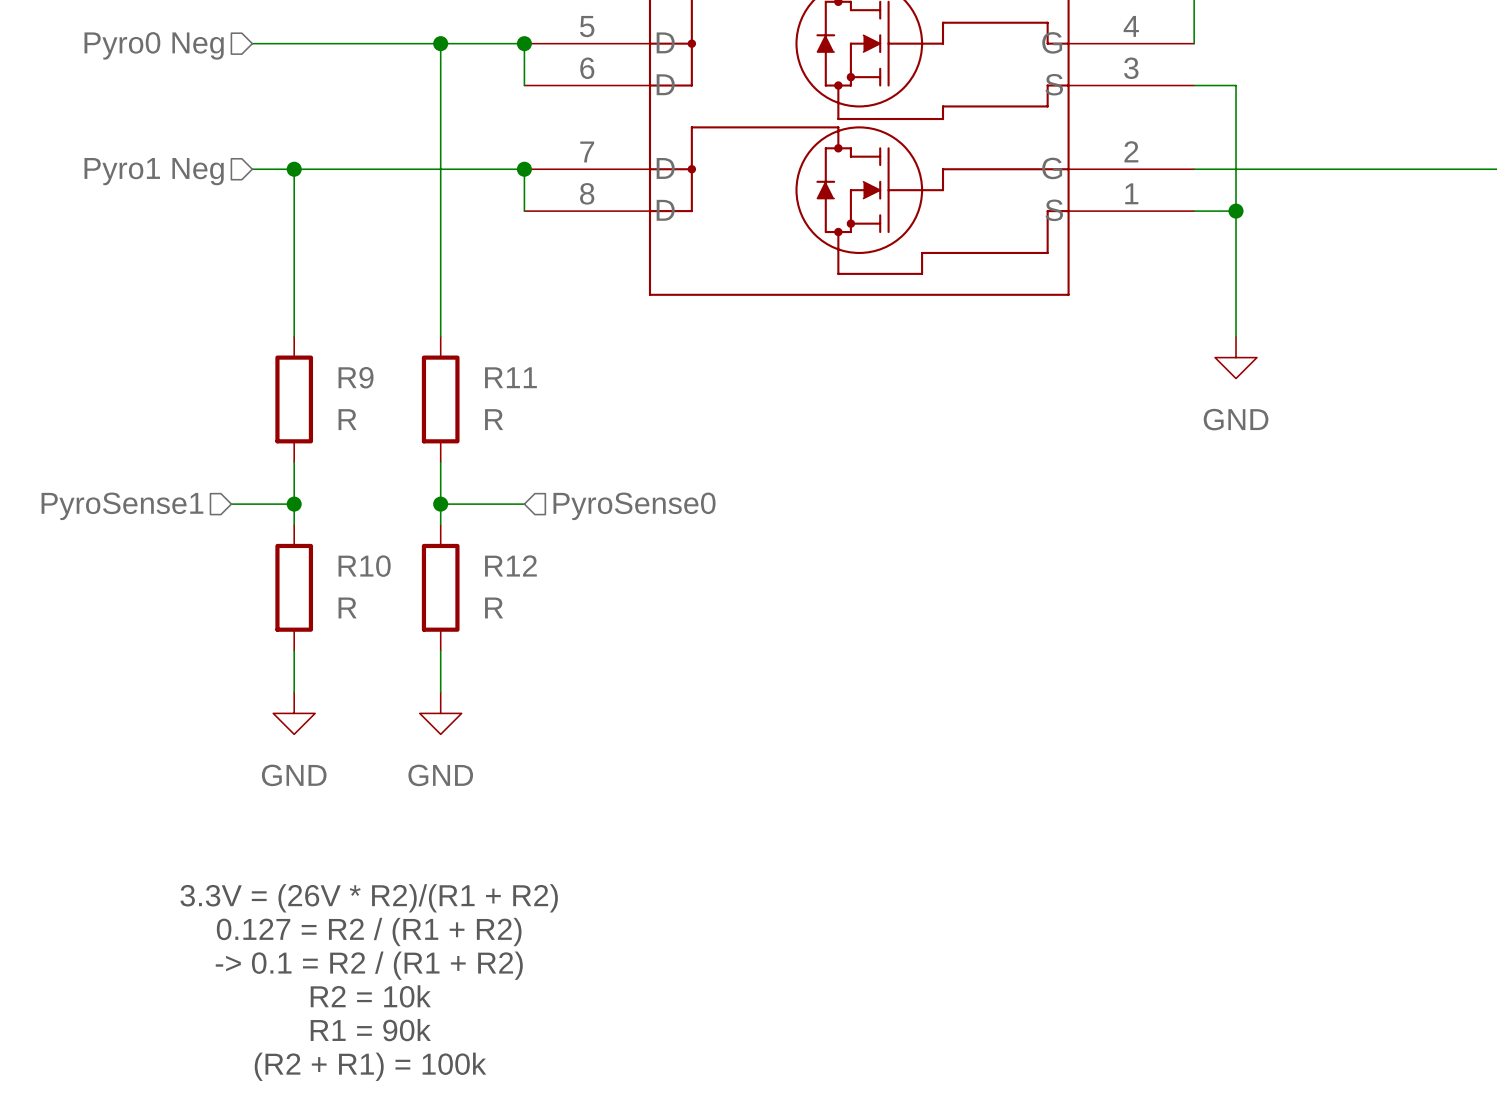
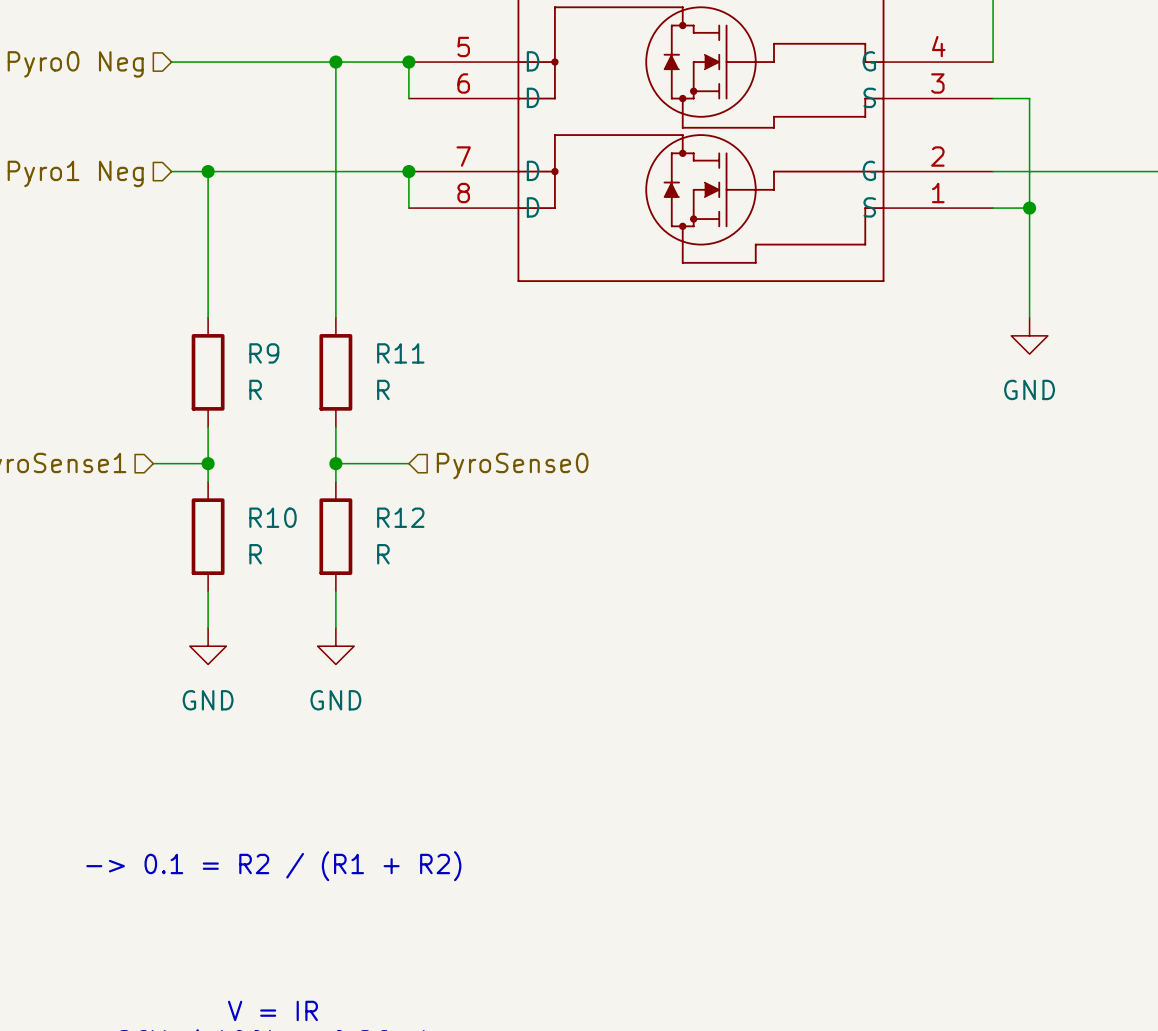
text: 3.3V = (26V * R2)/(R1 + R2) (369, 898) -> none
text: 0.127 = R2 / (R1 + R2) (369, 932) -> none
text: R2 = 10k (370, 996) -> none
text: R1 = 90k (370, 1030) -> none
text: (R2 + R1) = 100k (370, 1066) -> none

